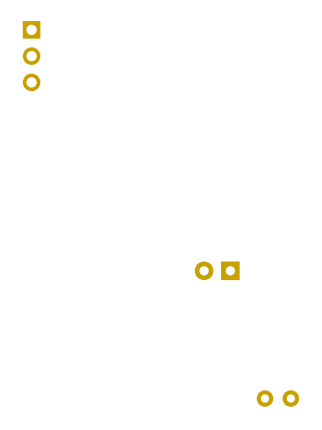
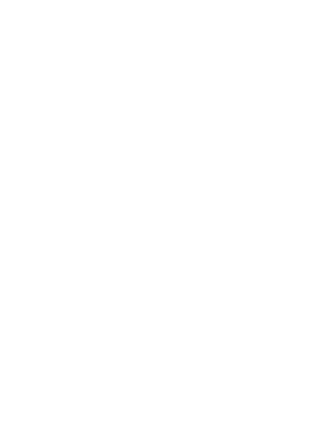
part: (31, 56) -> none
part: (217, 270) -> none
part: (277, 398) -> none

